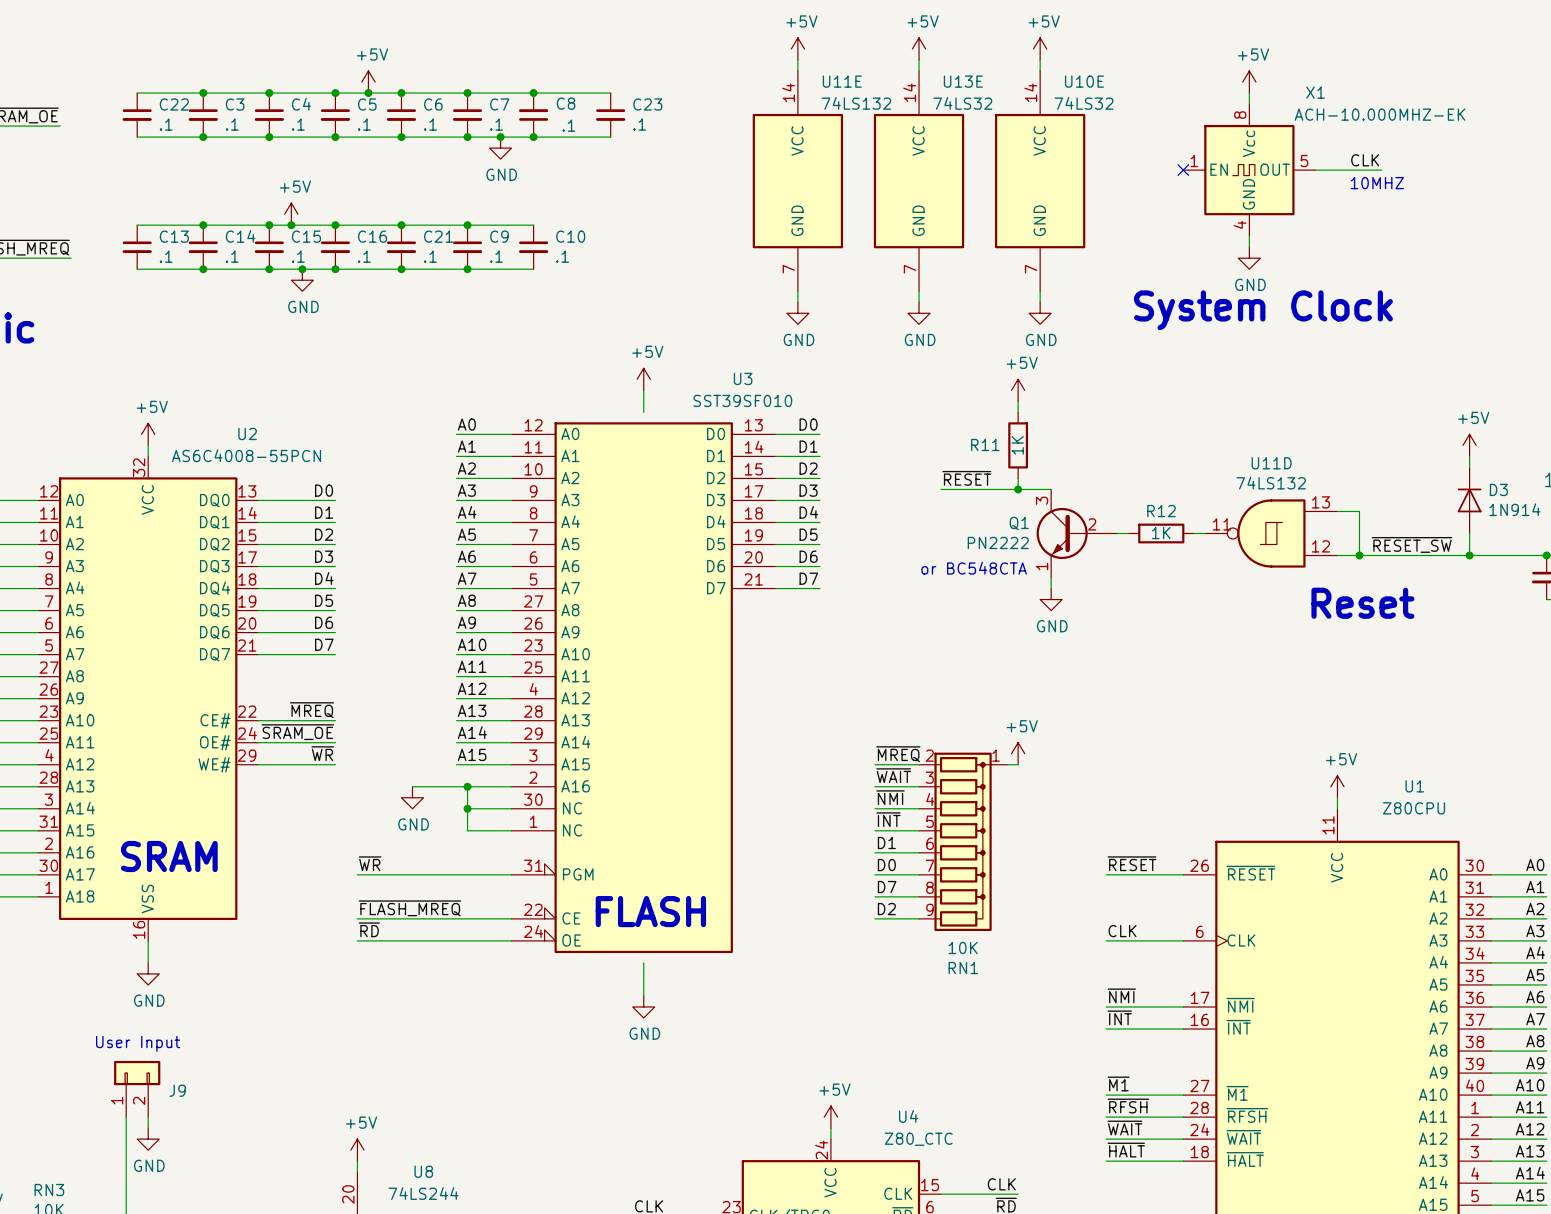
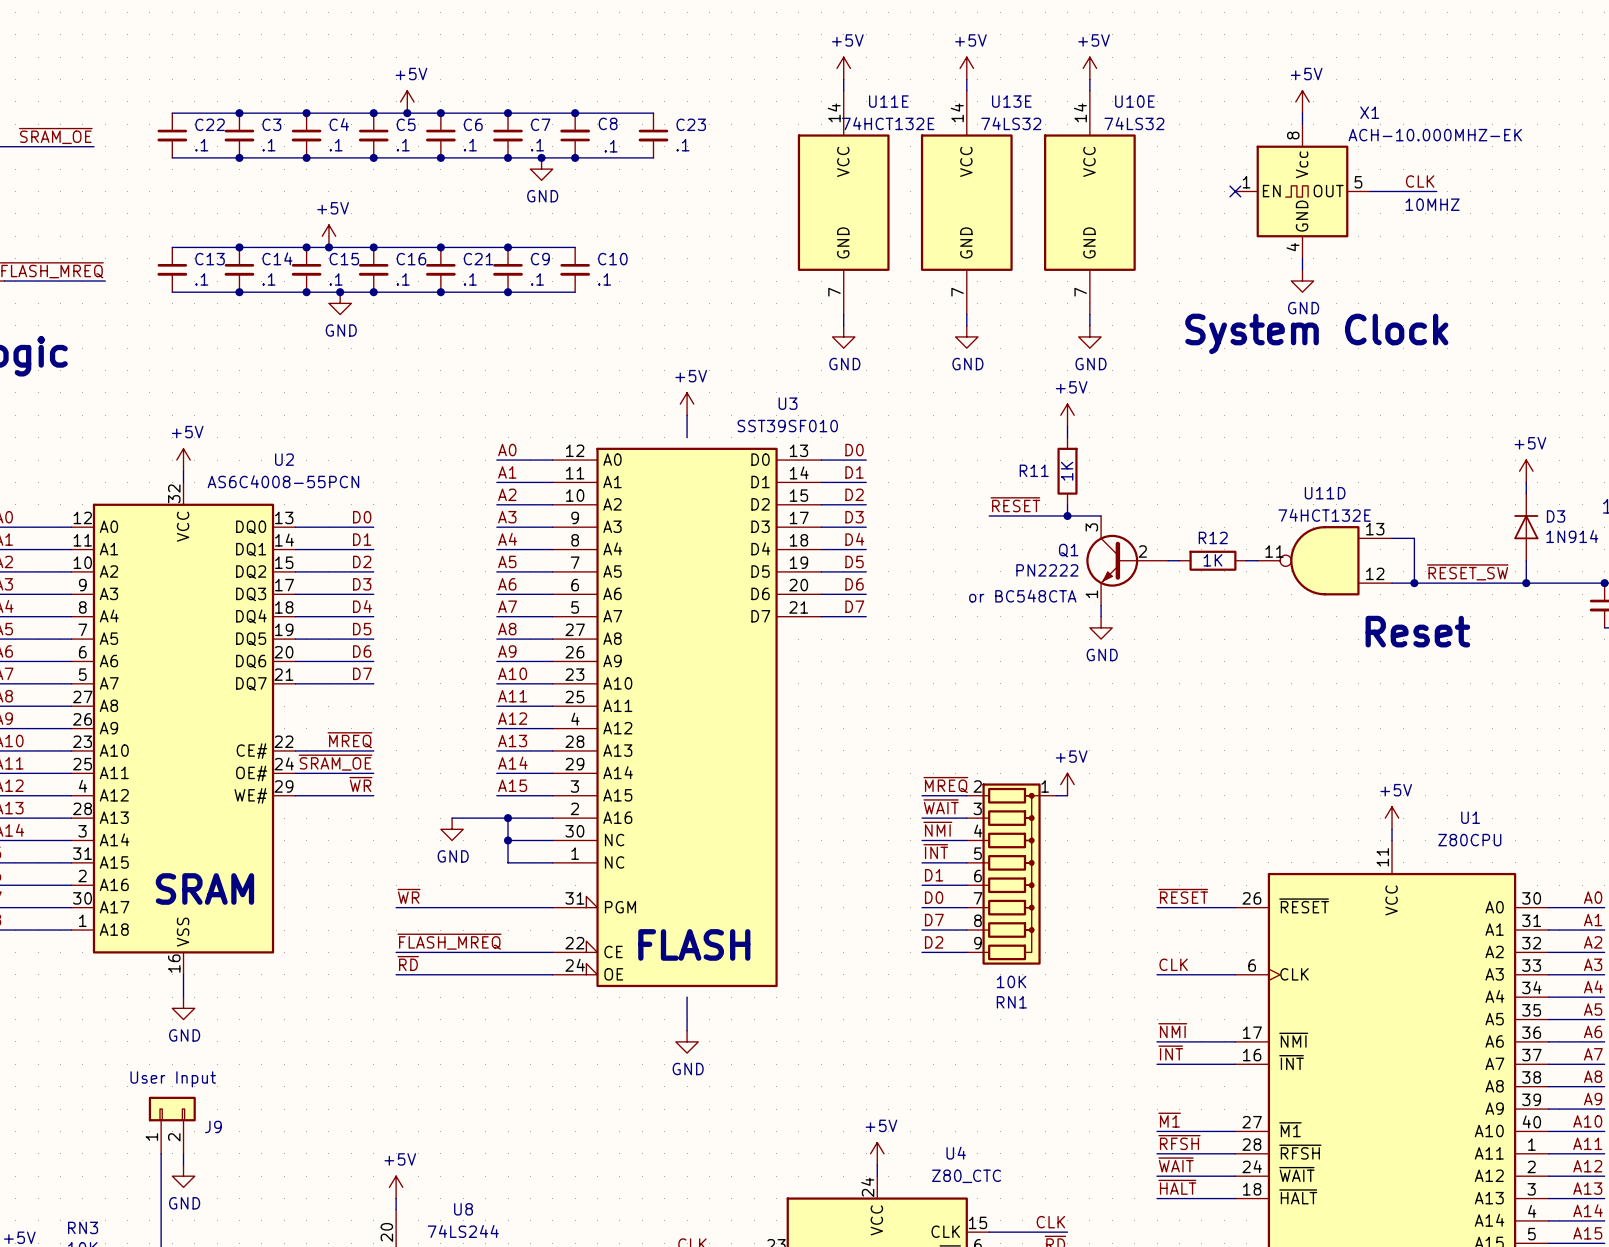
U11E value: 74LS132 (856, 103) -> 74HCT132E (888, 123)
U11D value: 74LS132 (1271, 483) -> 74HCT132E (1324, 515)
U11D symbol: [1205, 499, 1338, 568] -> [1257, 526, 1393, 596]

